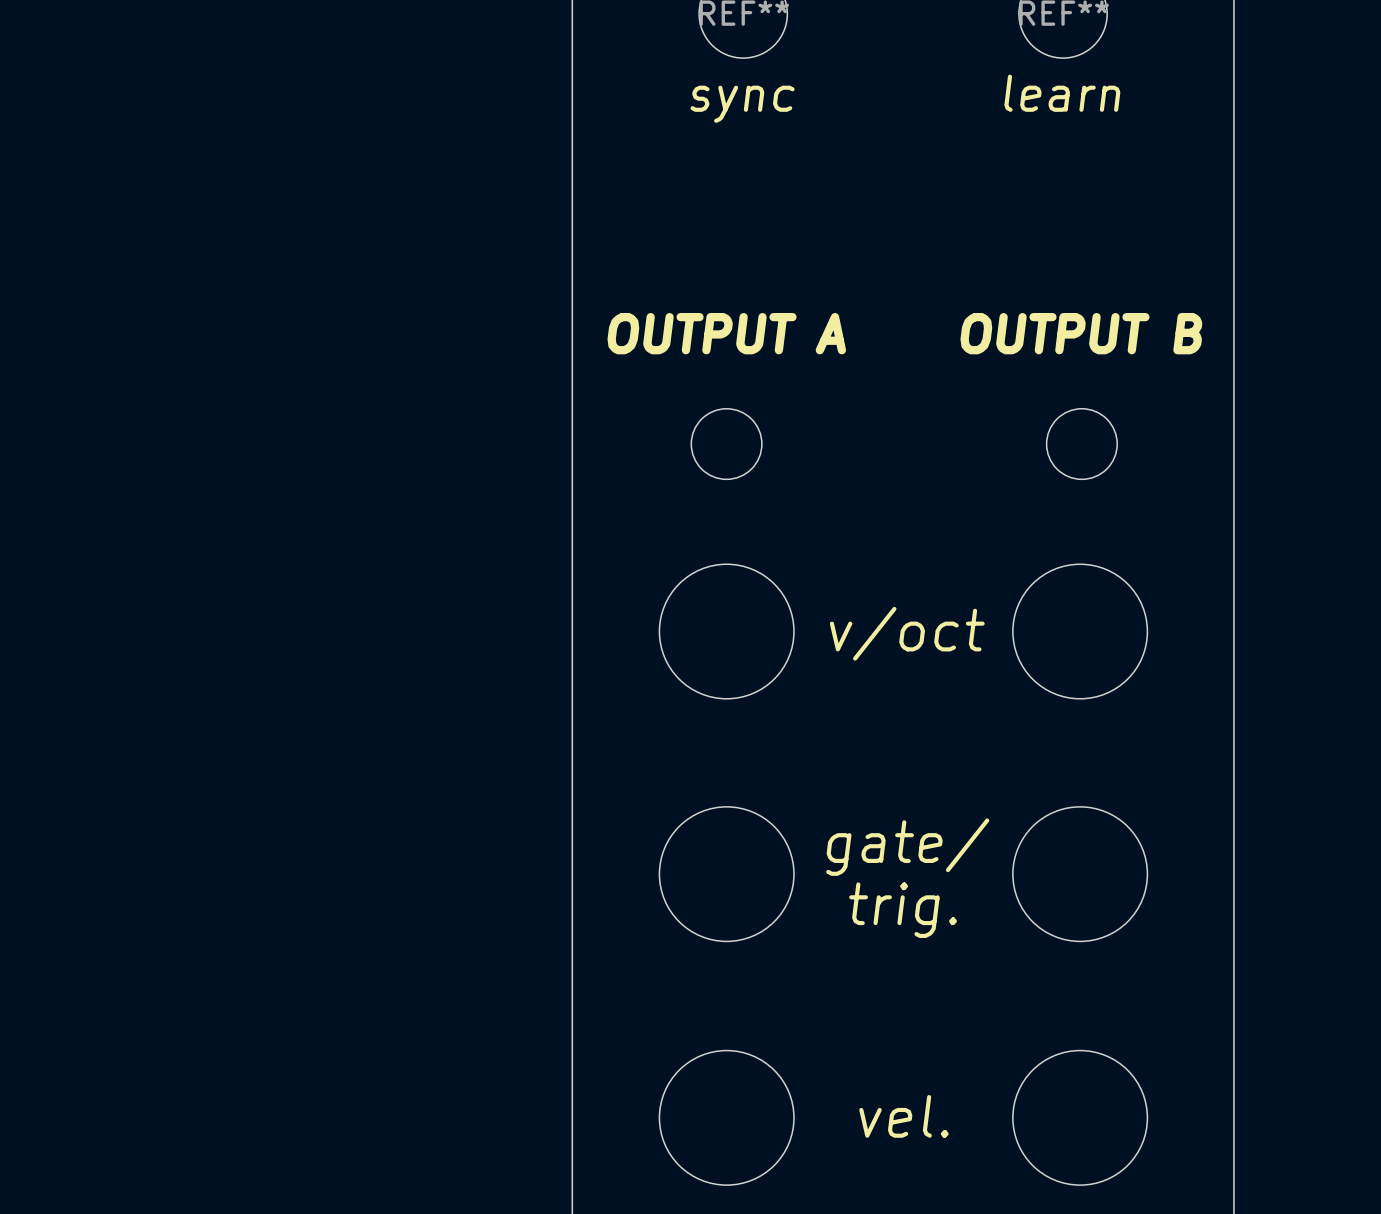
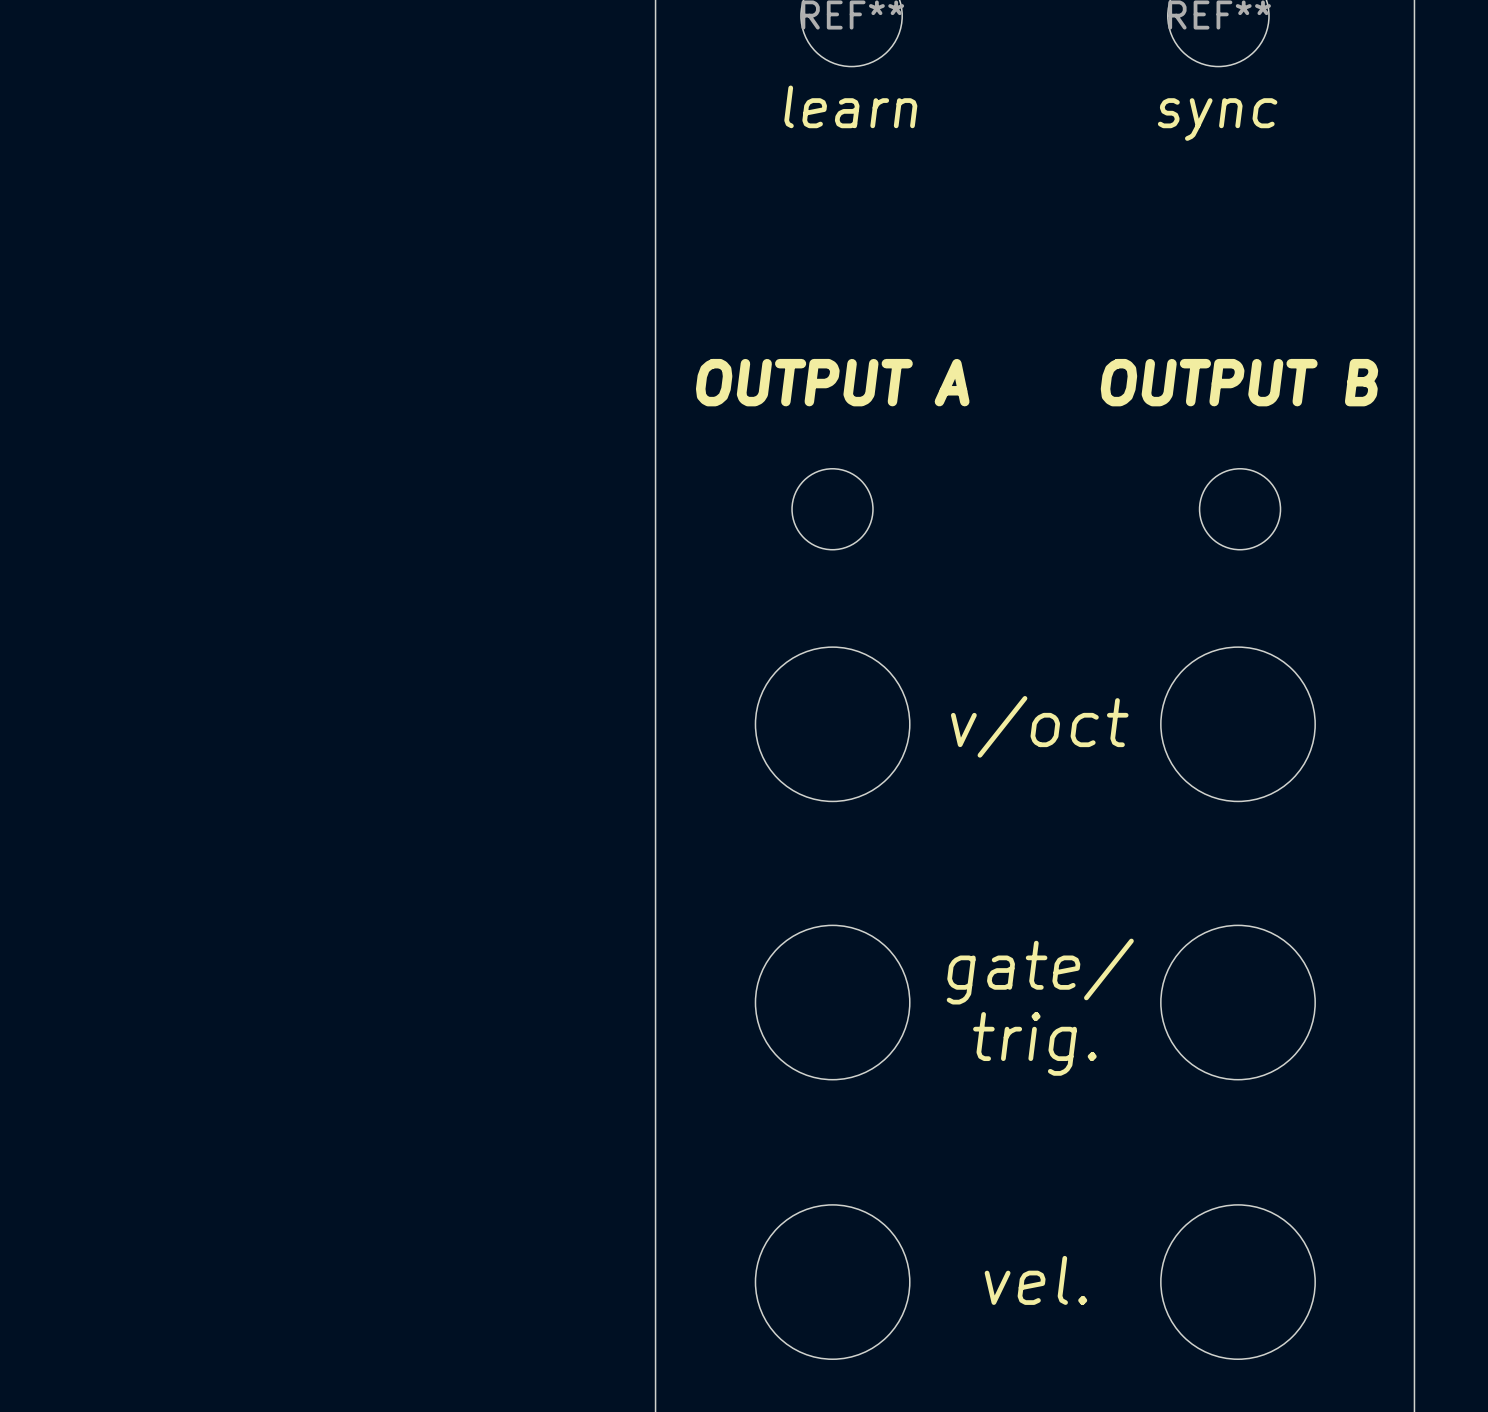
text: learn (1062, 93) -> sync (1217, 119)
text: sync (742, 104) -> learn (850, 106)

